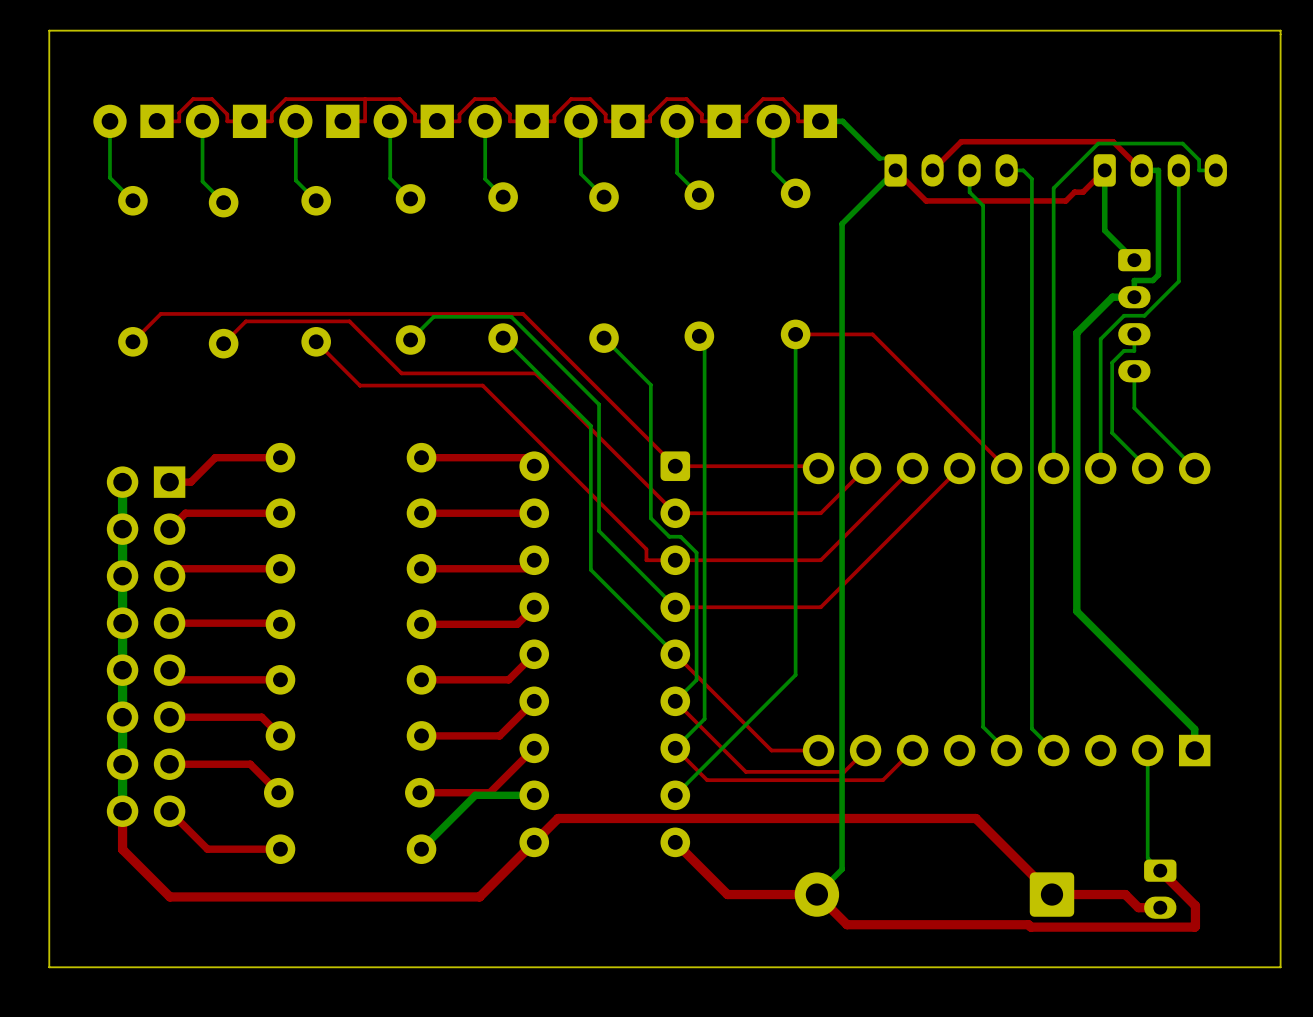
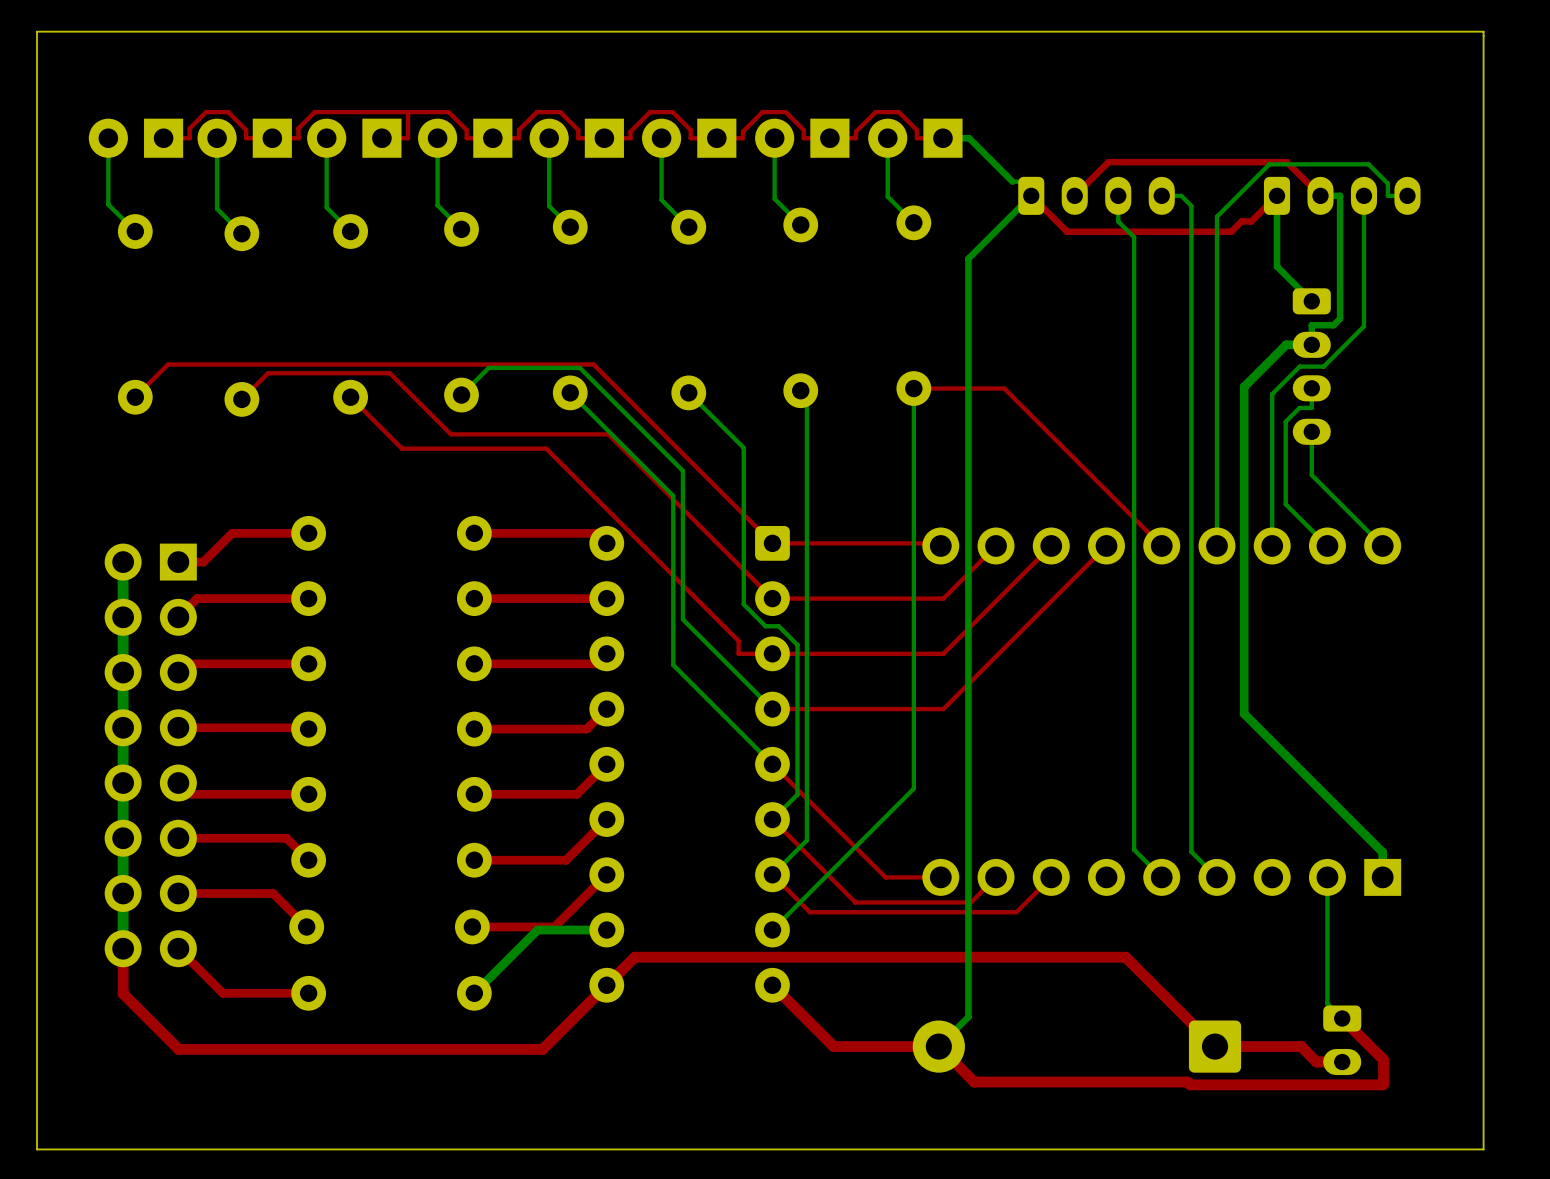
board edge: (1280, 967) (49, 967) -> (1483, 1132) (1483, 1149) (37, 1149) (37, 1132)

